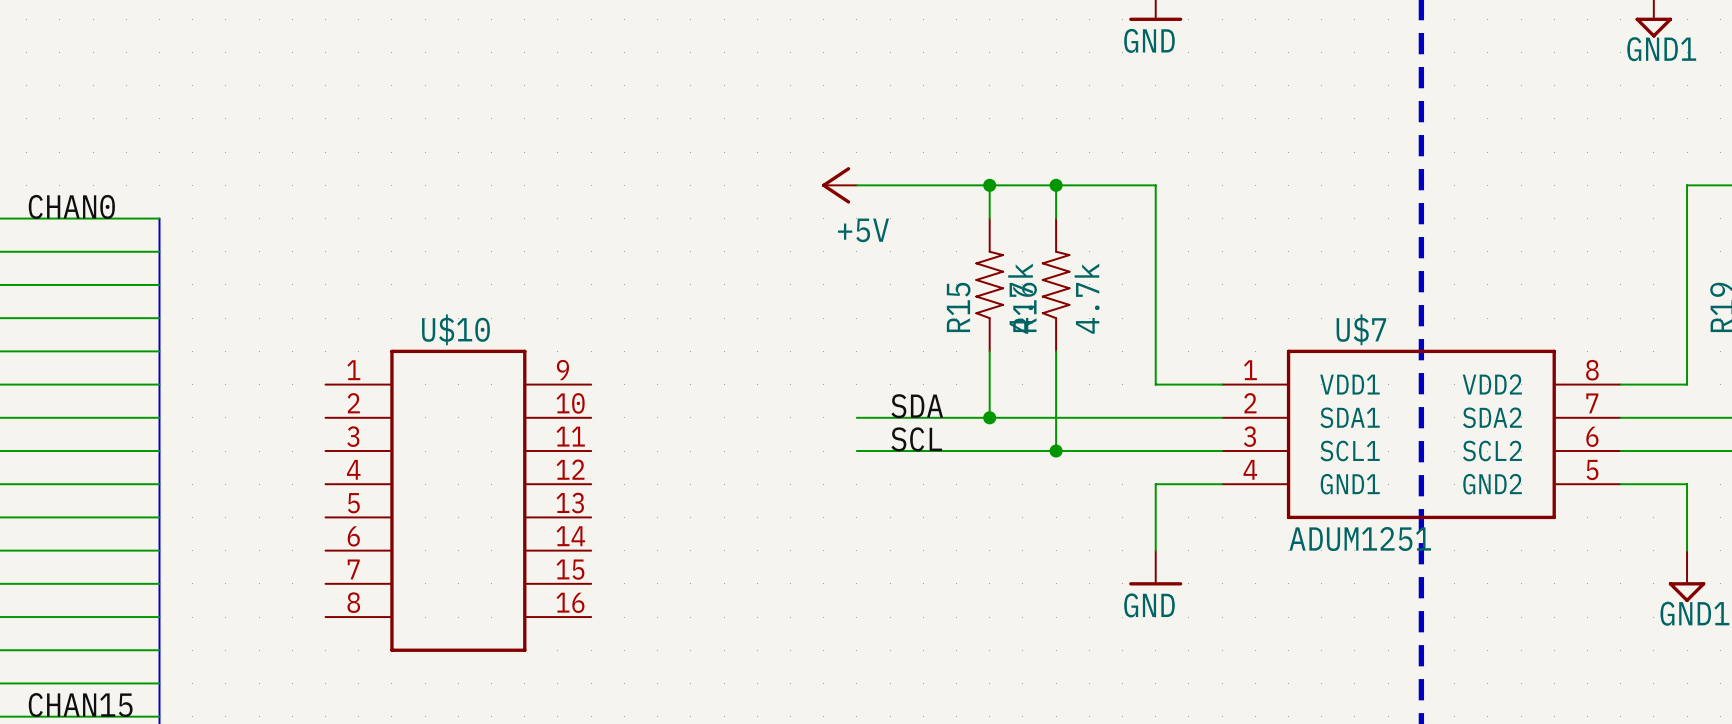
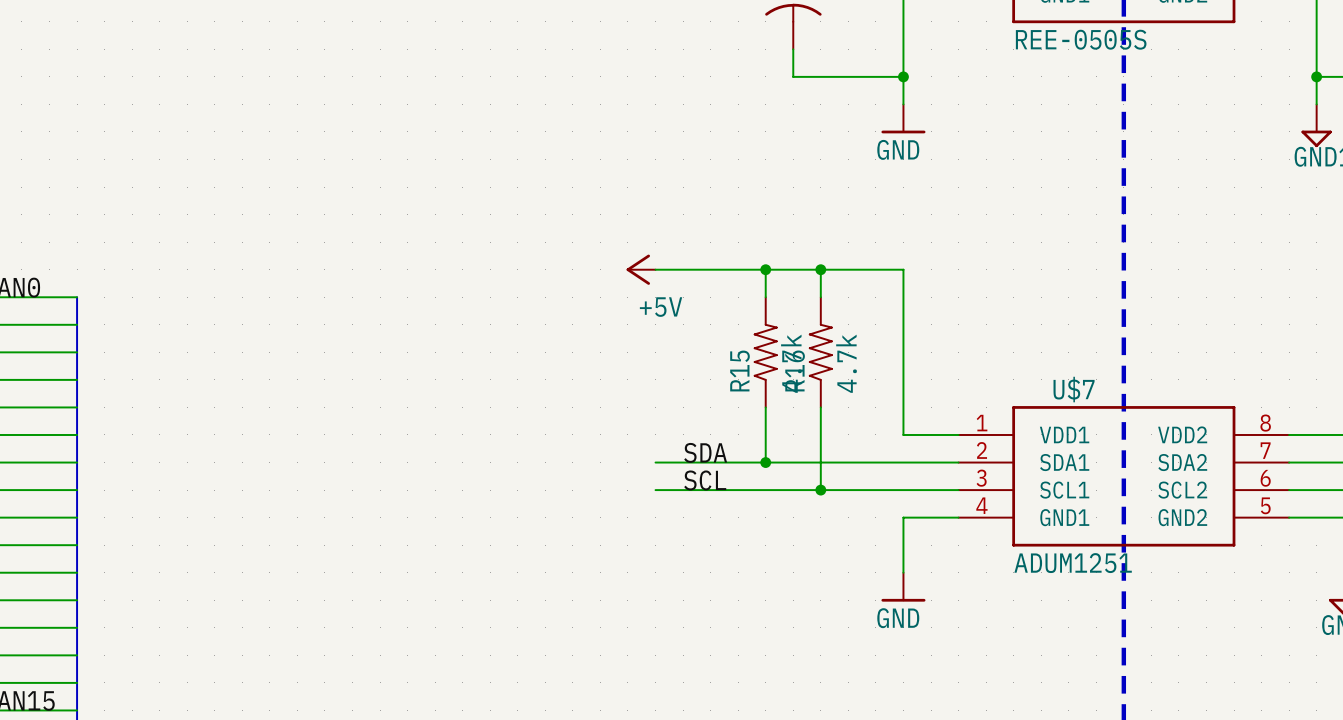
U$10: (458, 500) -> none

